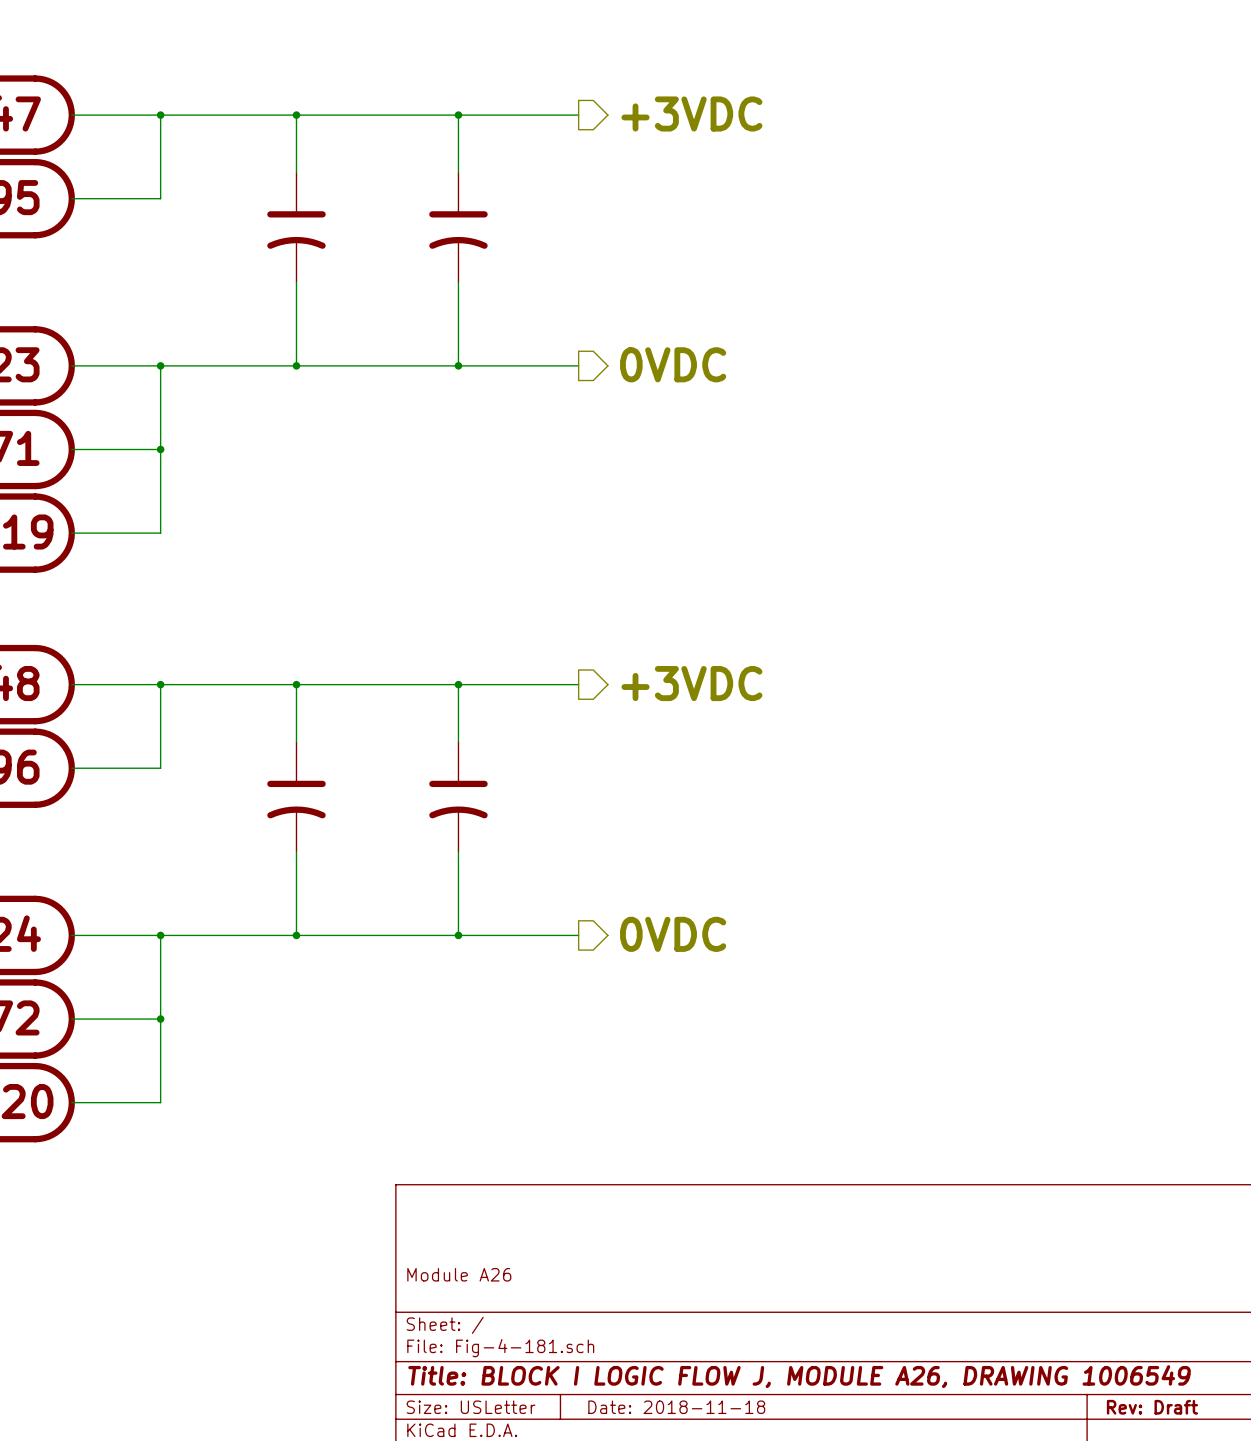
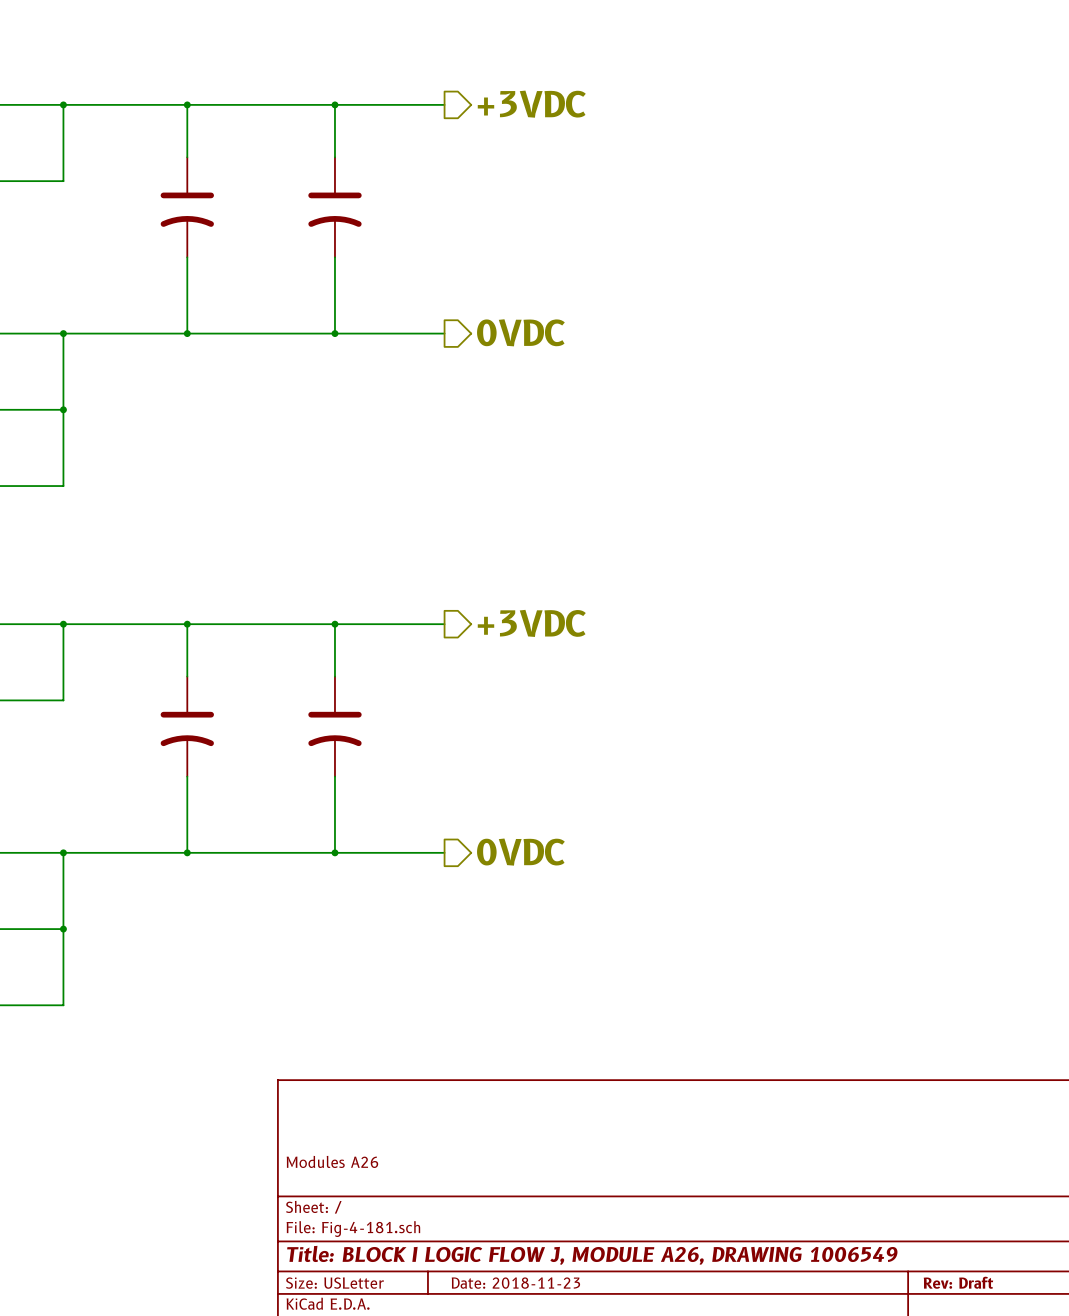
title block: Module A26 (459, 1274) -> Modules A26 (332, 1161)
title block: Date: 2018-11-18 (676, 1407) -> Date: 2018-11-23 (515, 1283)

